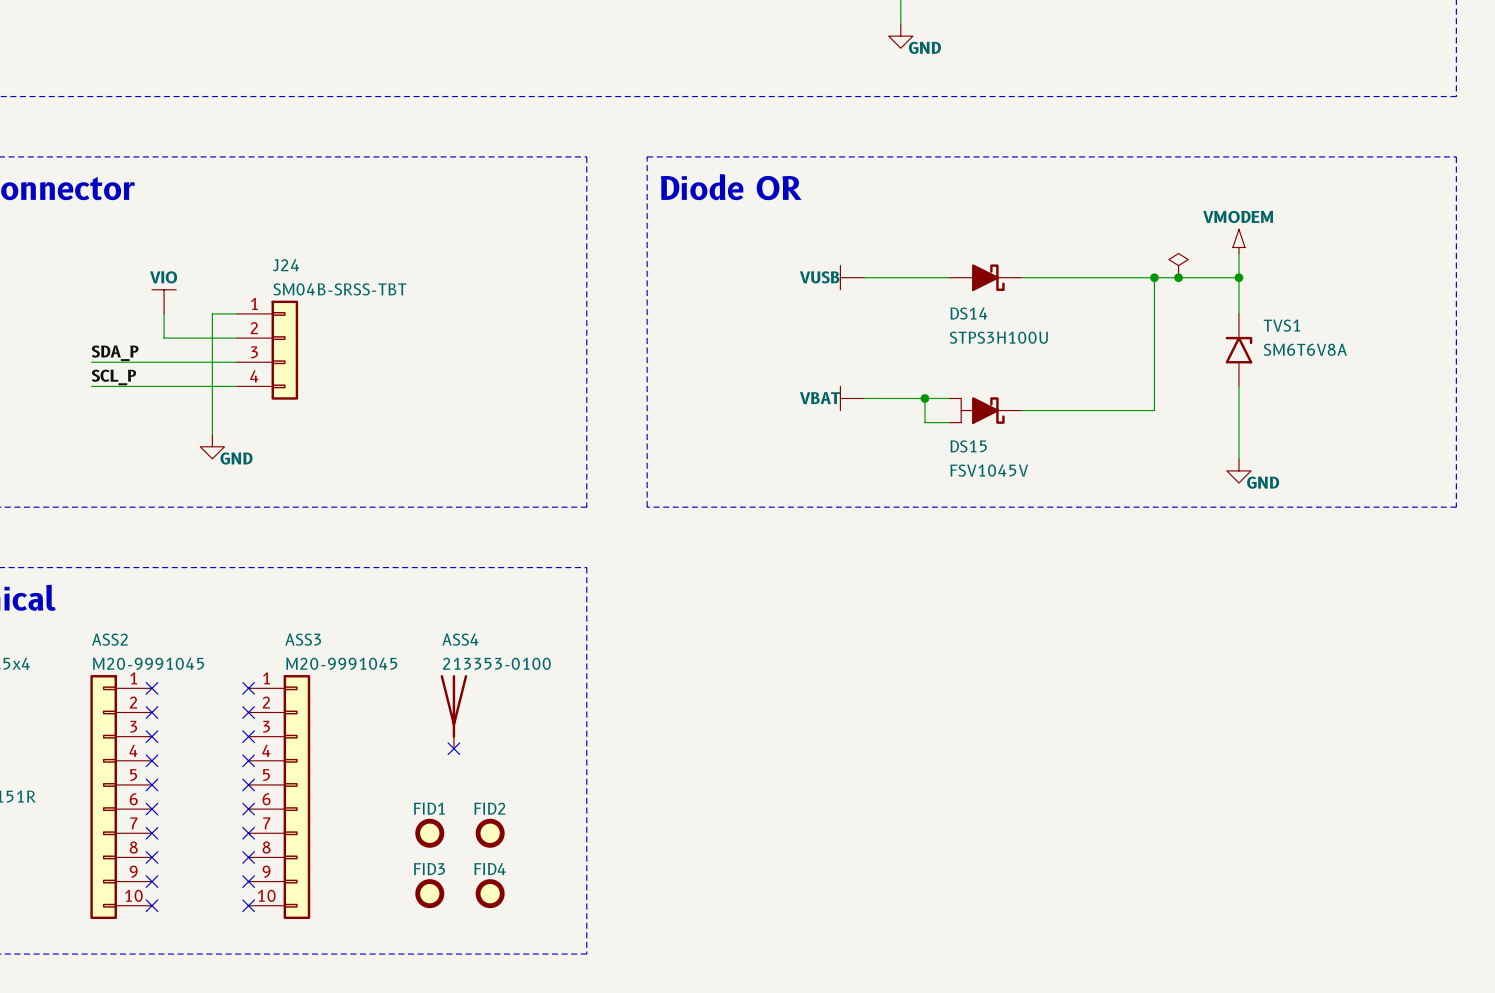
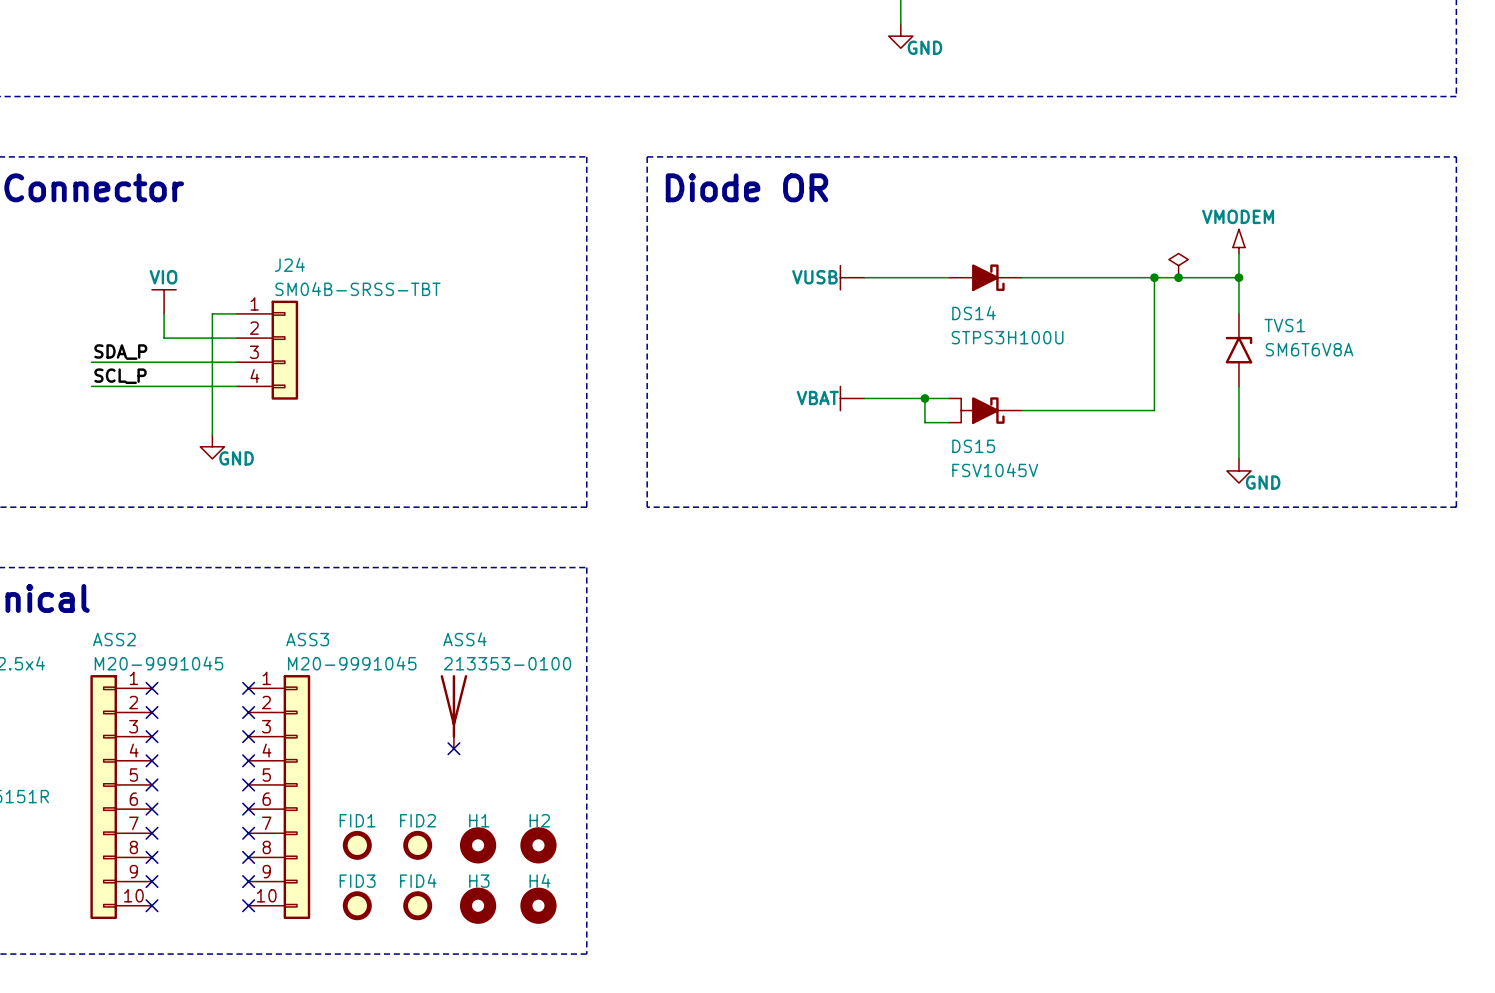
FID1 position: (429, 833) -> (357, 845)
FID2 position: (490, 833) -> (417, 845)
H1: none -> (478, 845)
H2: none -> (538, 845)
FID3 position: (429, 893) -> (357, 905)
FID4 position: (490, 893) -> (417, 905)
H3: none -> (478, 905)
H4: none -> (538, 905)

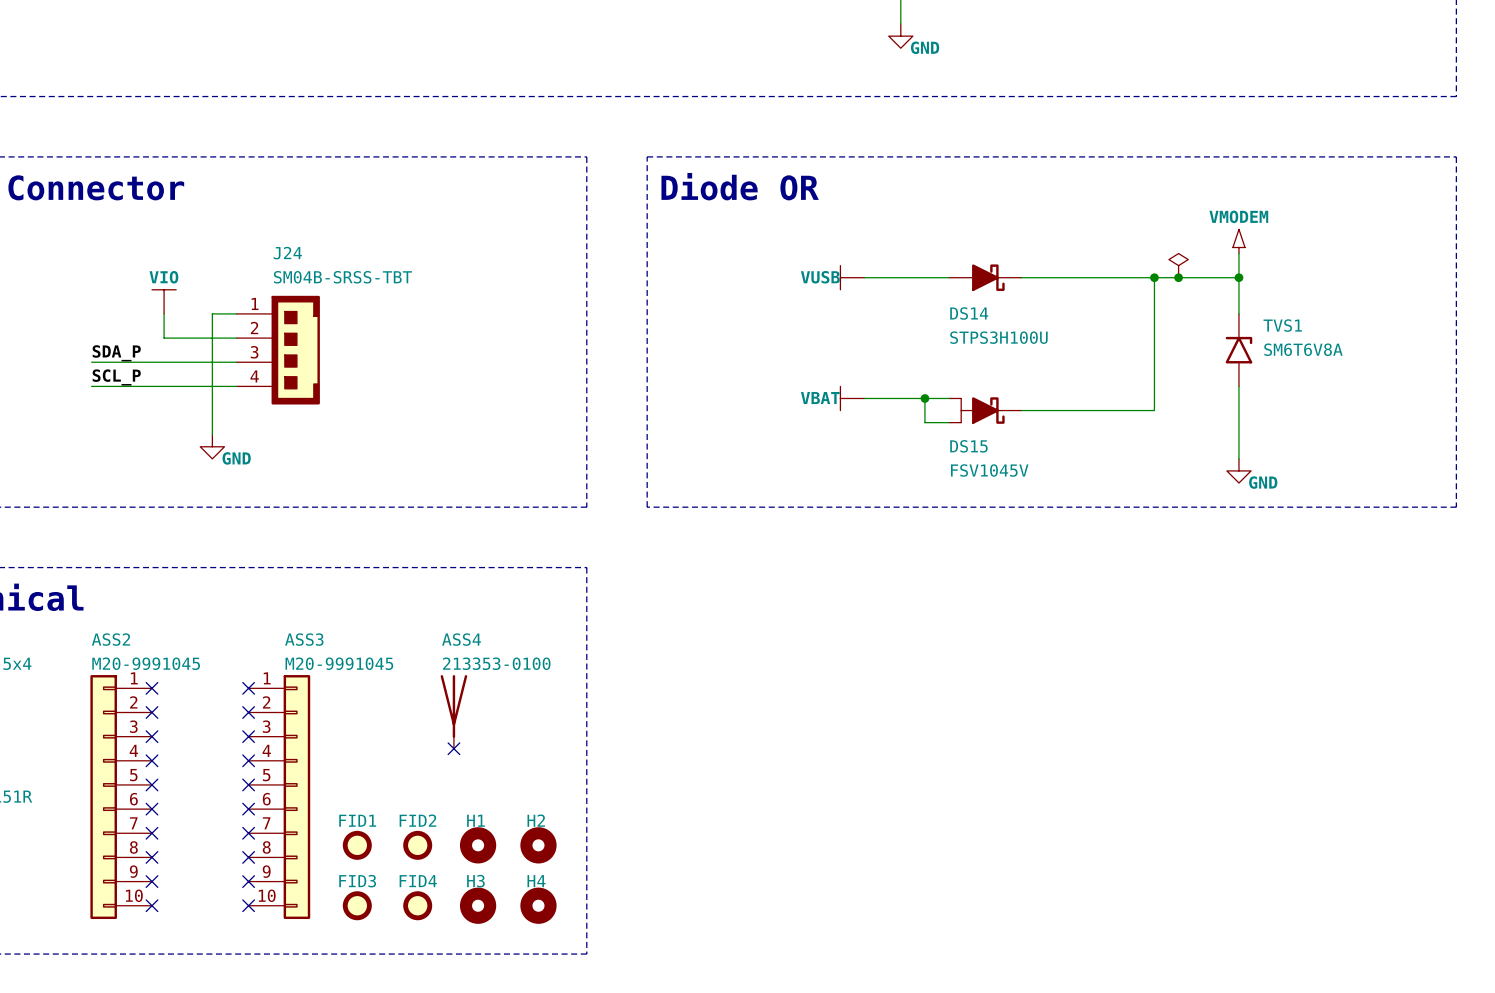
J24 symbol: [236, 300, 299, 400] -> [236, 295, 320, 405]

